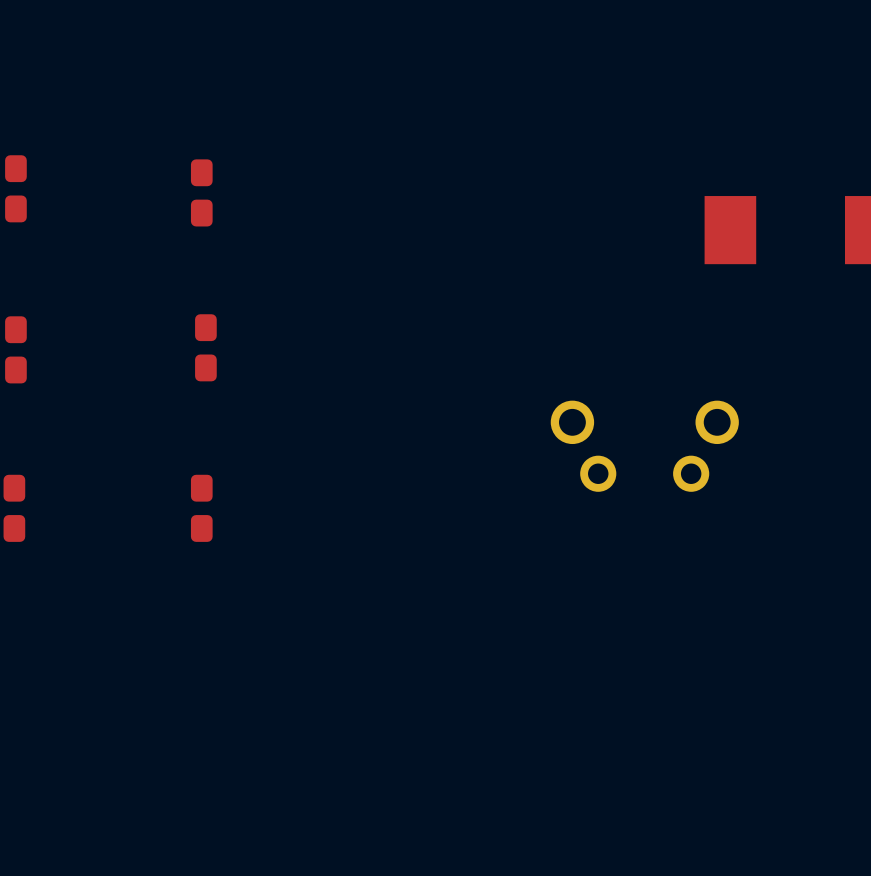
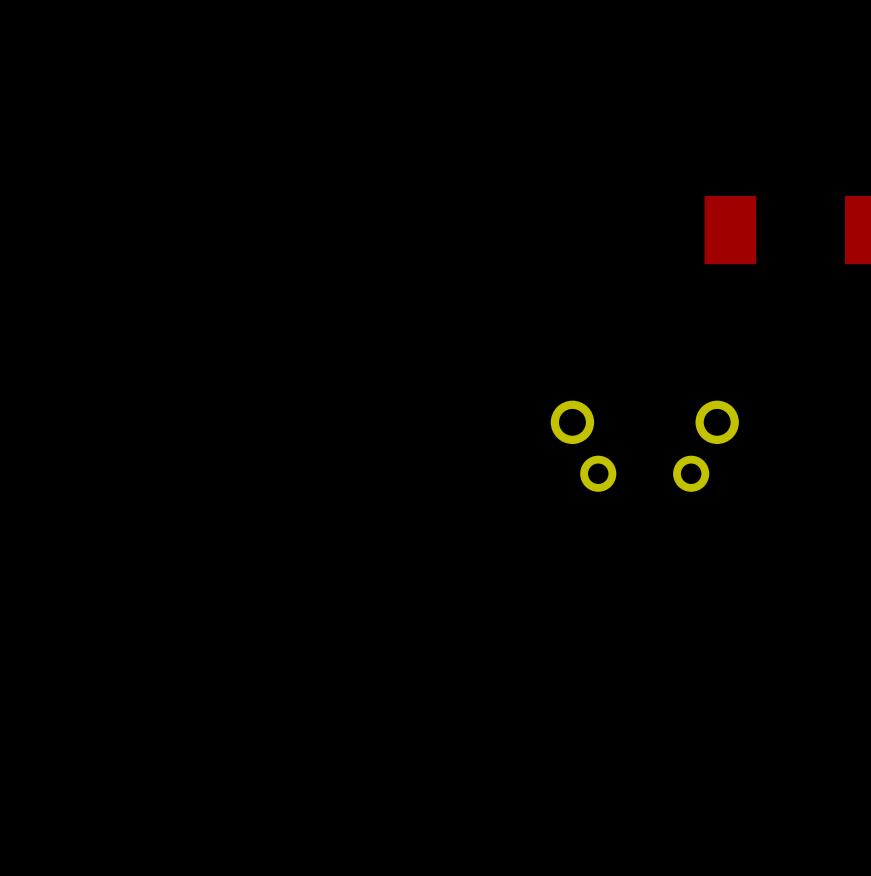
part: (15, 188) -> none
part: (201, 192) -> none
part: (205, 347) -> none
part: (15, 349) -> none
part: (14, 508) -> none
part: (201, 508) -> none

